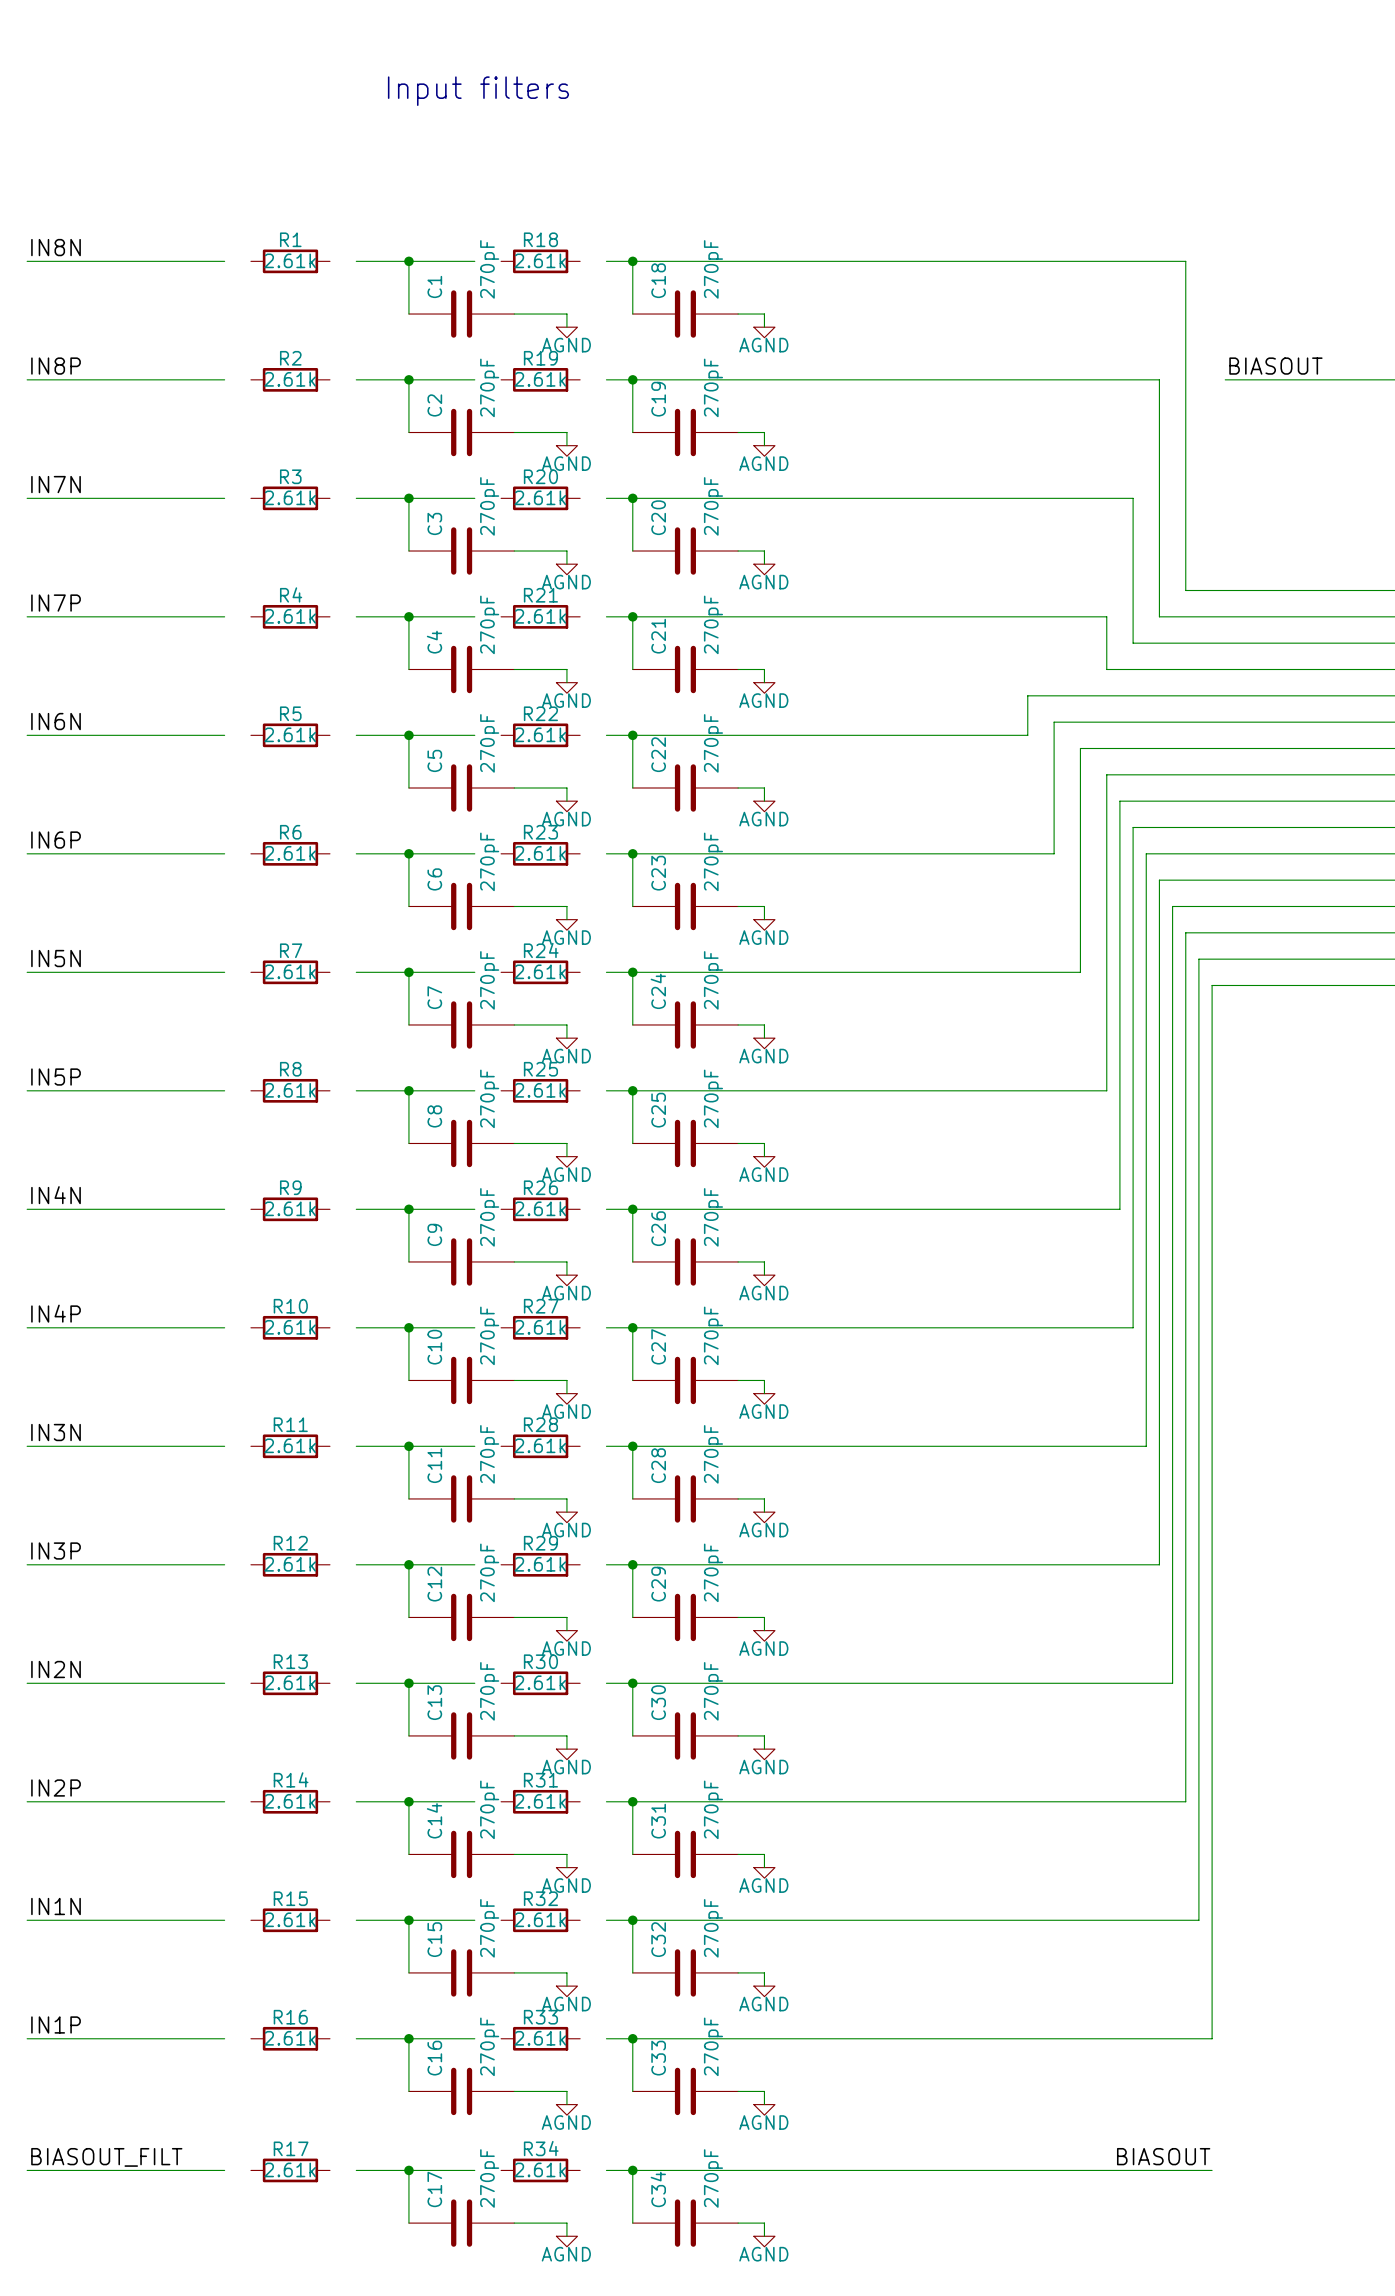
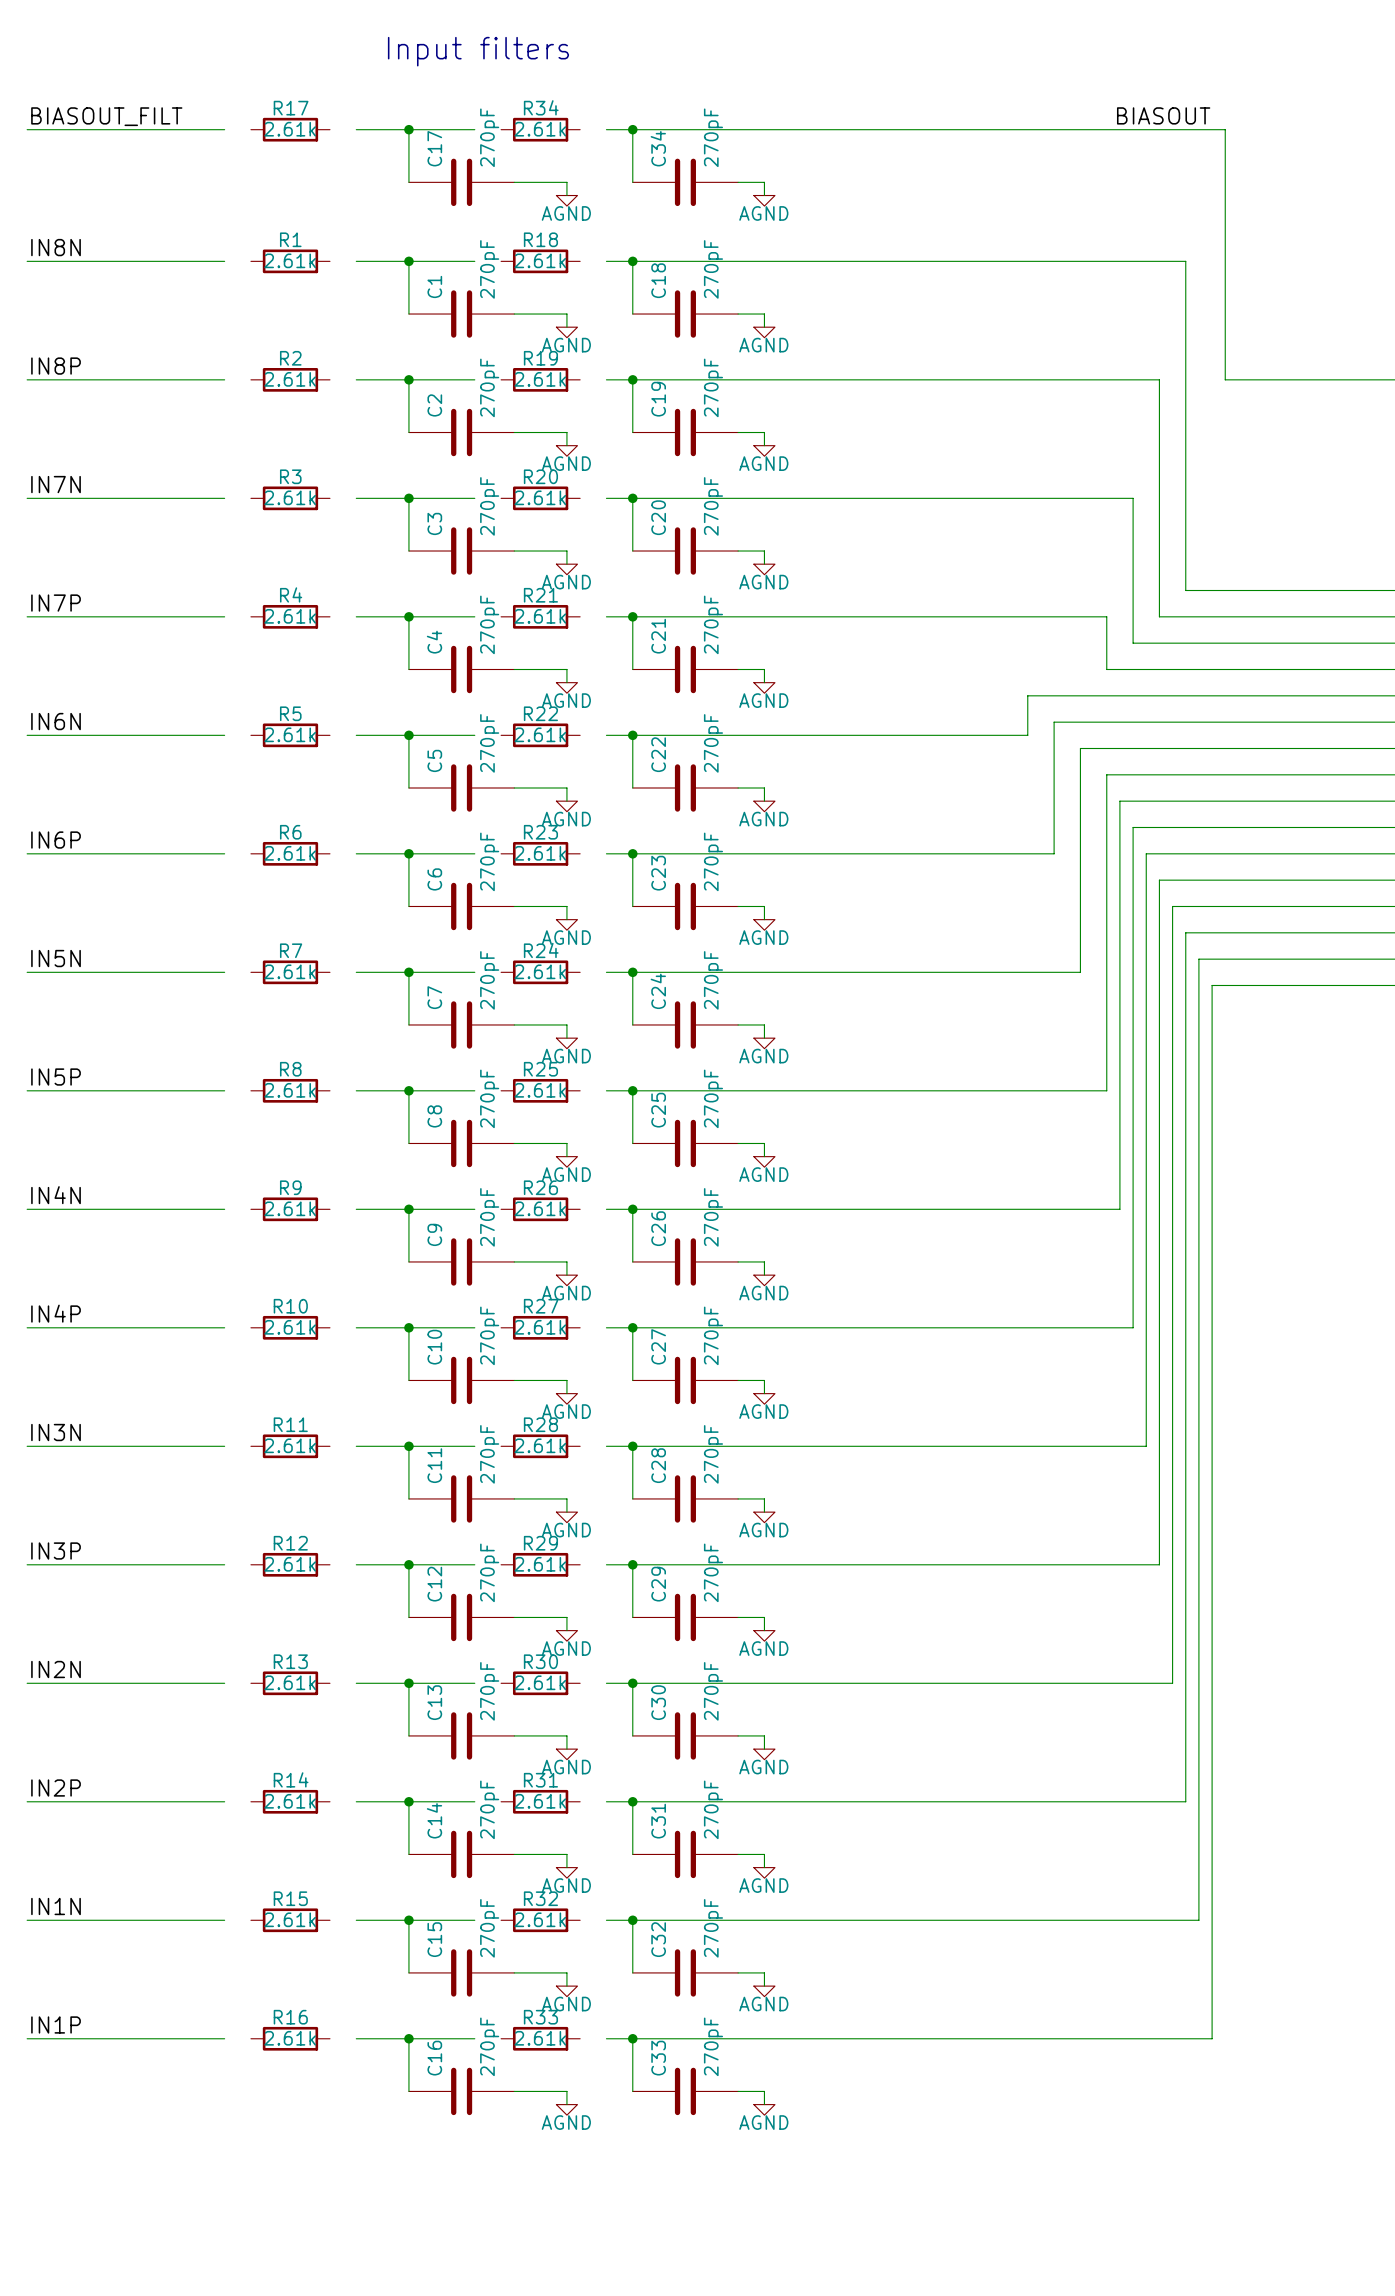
text position: Input filters (478, 91) -> Input filters (478, 51)
label: none -> BIASOUT_FILT (106, 116)
wire: none -> (27, 129) (224, 129)
wire: none -> (356, 129) (474, 129)
wire: none -> (408, 129) (408, 182)
junction: none -> (408, 129)
wire: none -> (606, 129) (1225, 129) (1225, 379)
wire: none -> (632, 129) (632, 182)
junction: none -> (632, 129)
wire: none -> (514, 182) (566, 182) (566, 195)
wire: none -> (738, 182) (764, 182) (764, 195)
power symbol: none -> AGND (566, 200)
power symbol: none -> AGND (764, 200)
label position: BIASOUT (1275, 366) -> BIASOUT (1163, 115)
label: BIASOUT (1163, 2156) -> none
label: BIASOUT_FILT (106, 2157) -> none
wire: (27, 2170) (224, 2170) -> none
R17 position: (290, 2170) -> (290, 129)
wire: (356, 2170) (474, 2170) -> none
wire: (408, 2170) (408, 2223) -> none
junction: (408, 2170) -> none
R34 position: (540, 2170) -> (540, 129)
wire: (606, 2170) (1212, 2170) -> none
wire: (632, 2170) (632, 2223) -> none
junction: (632, 2170) -> none
C17 position: (461, 2223) -> (461, 182)
wire: (514, 2223) (566, 2223) (566, 2236) -> none
C34 position: (685, 2223) -> (685, 182)
wire: (738, 2223) (764, 2223) (764, 2236) -> none
power symbol: AGND (566, 2241) -> none
power symbol: AGND (764, 2241) -> none

